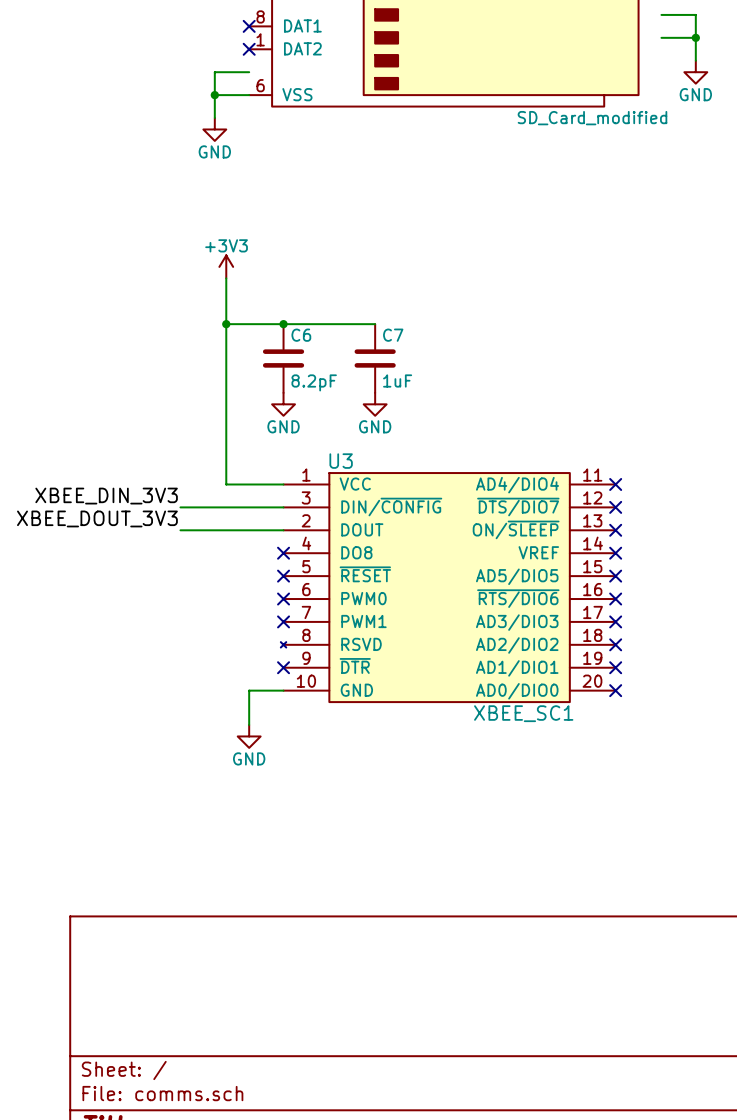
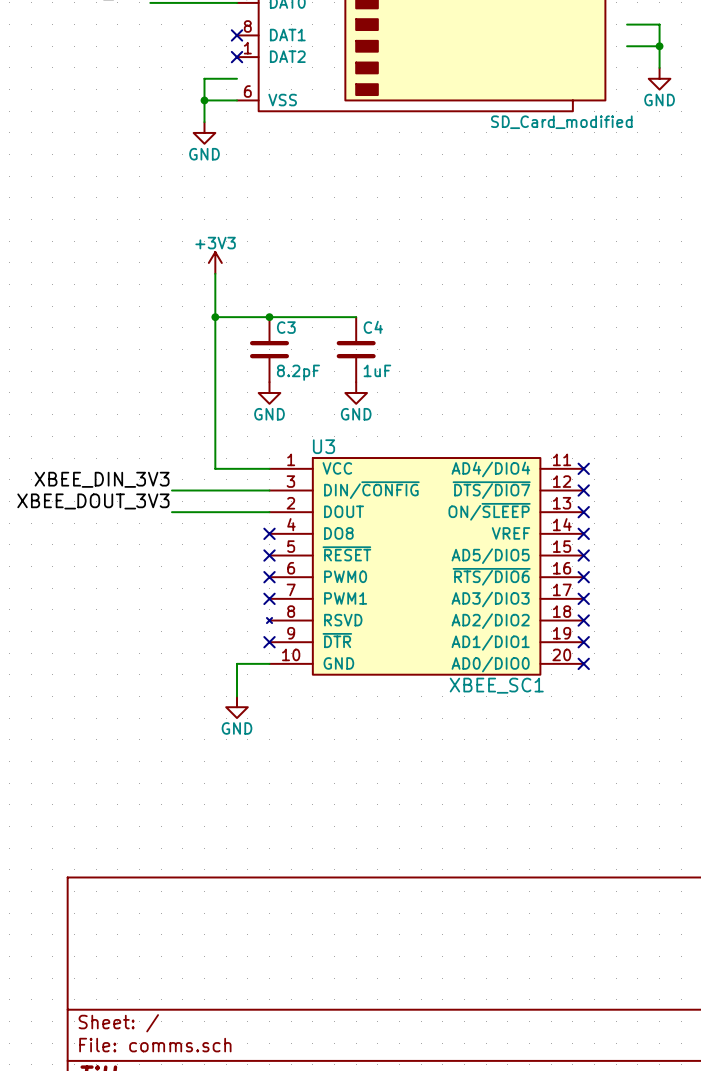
C6 name: C6 (301, 335) -> C3 (286, 327)
C7 name: C7 (393, 335) -> C4 (373, 327)

